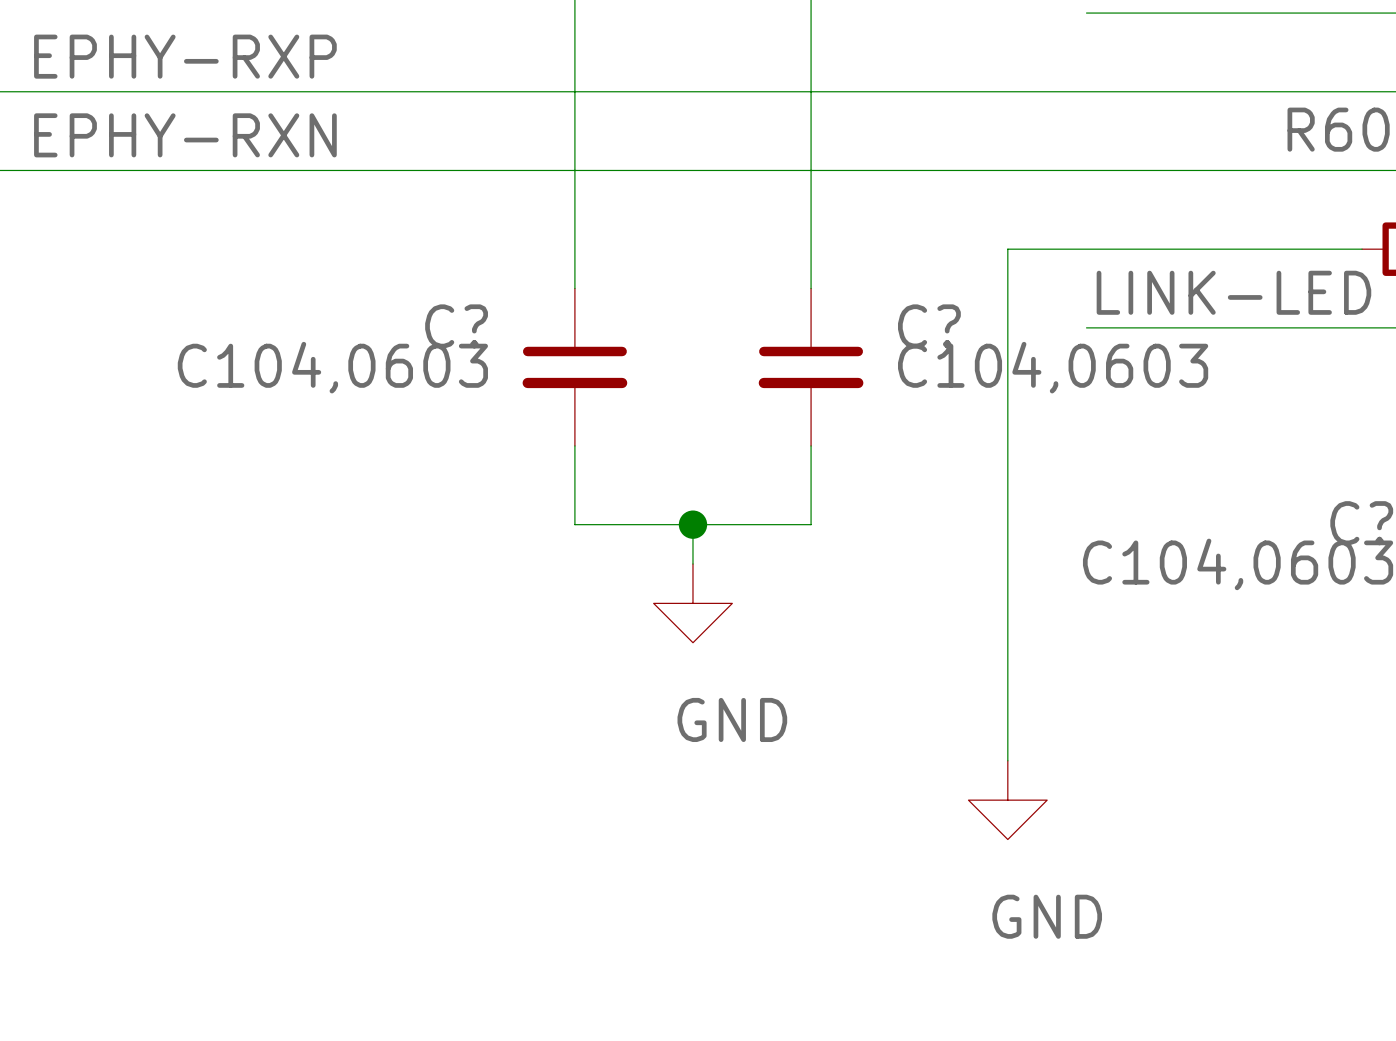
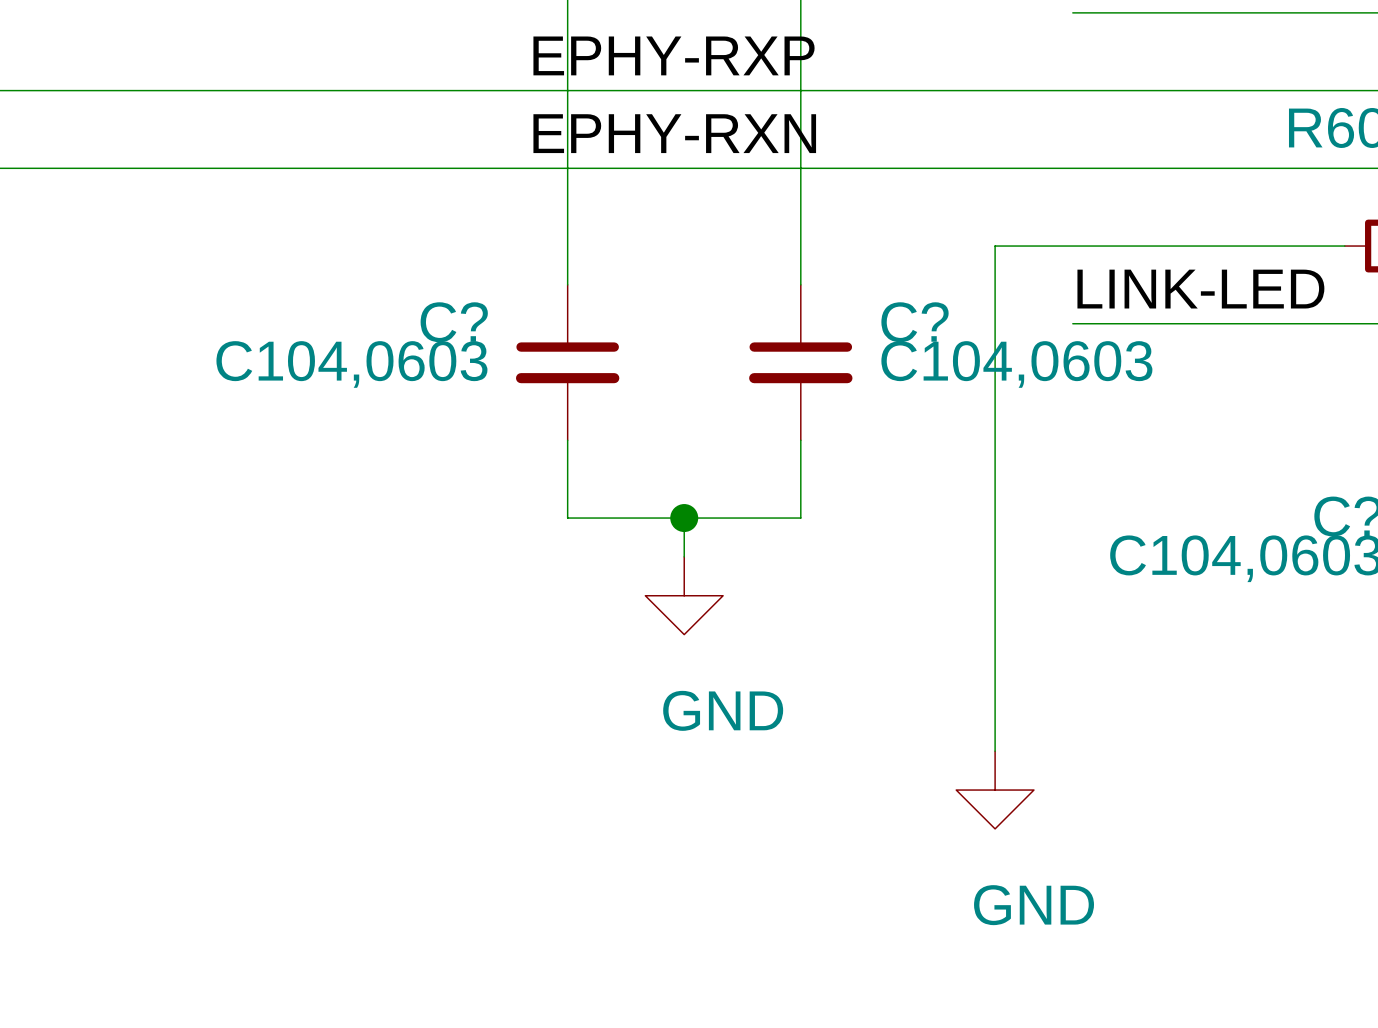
label position: EPHY-RXP (185, 56) -> EPHY-RXP (674, 55)
label position: EPHY-RXN (185, 135) -> EPHY-RXN (674, 133)

